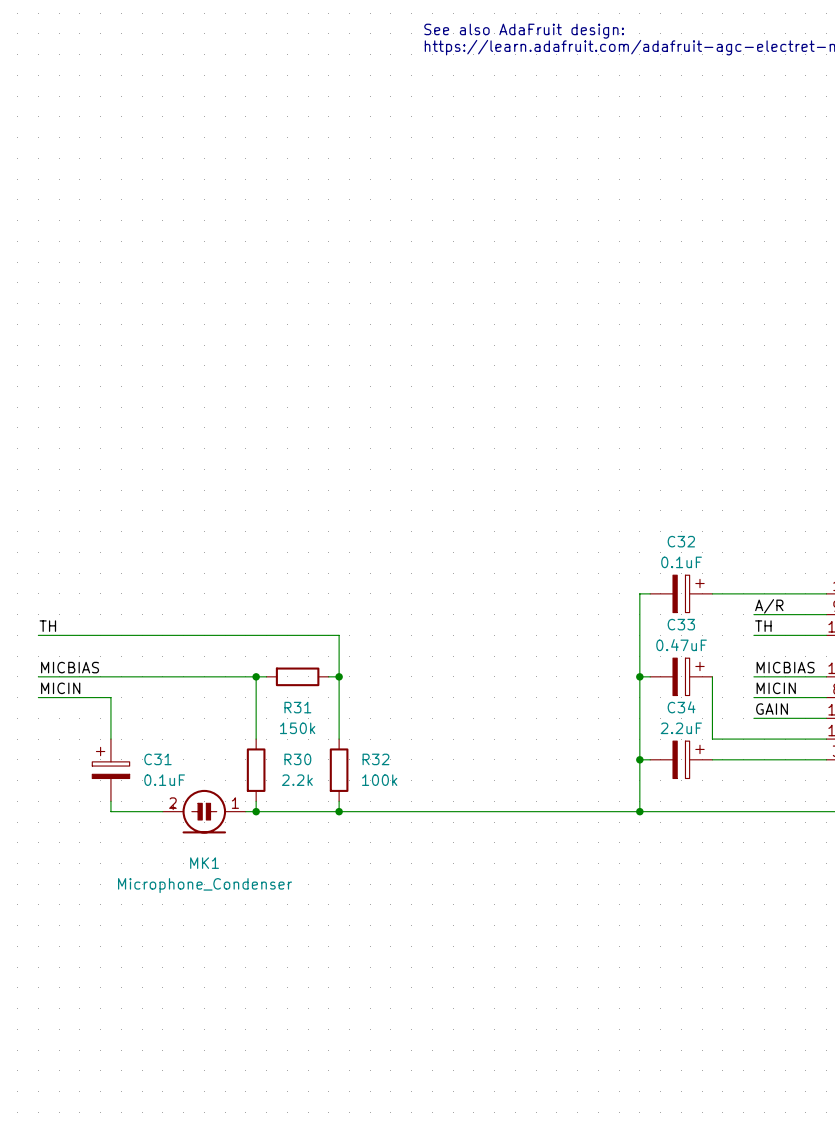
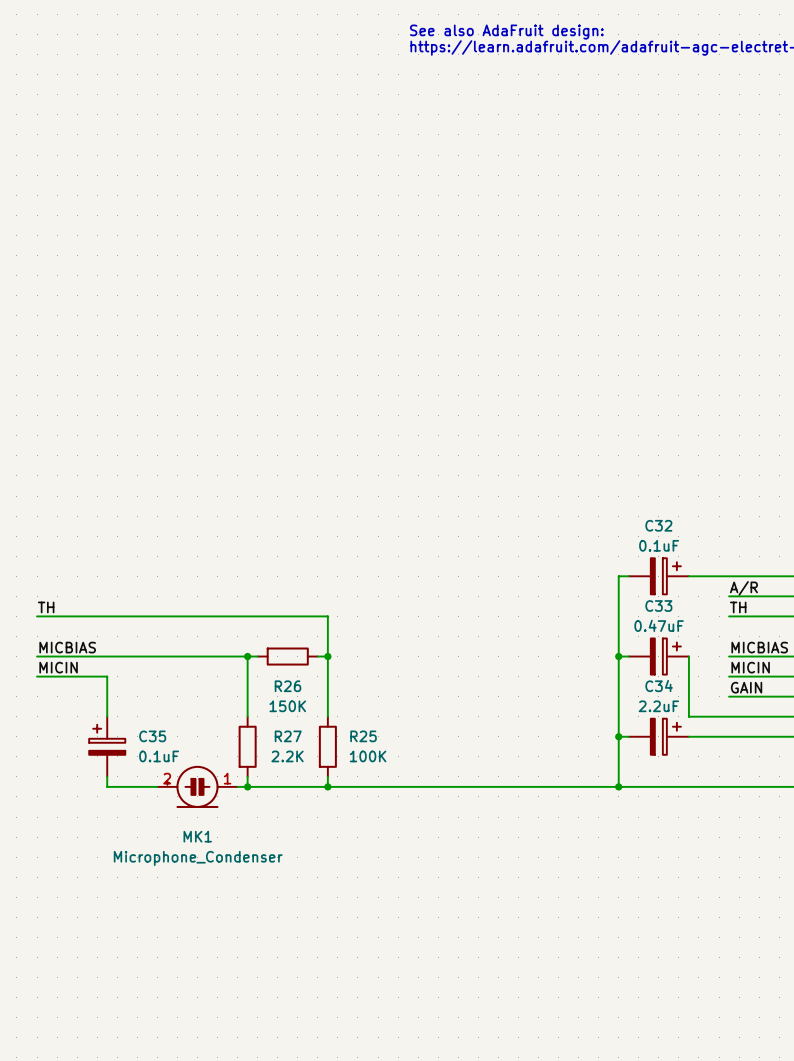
R31 name: R31 (297, 707) -> R26 (287, 686)
R31 value: 150k (297, 728) -> 150K (287, 706)
C31 name: C31 (157, 759) -> C35 (152, 736)
R30 name: R30 (297, 759) -> R27 (288, 736)
R32 name: R32 (375, 759) -> R25 (363, 736)
R30 value: 2.2k (297, 780) -> 2.2K (287, 756)
R32 value: 100k (379, 780) -> 100K (368, 756)

